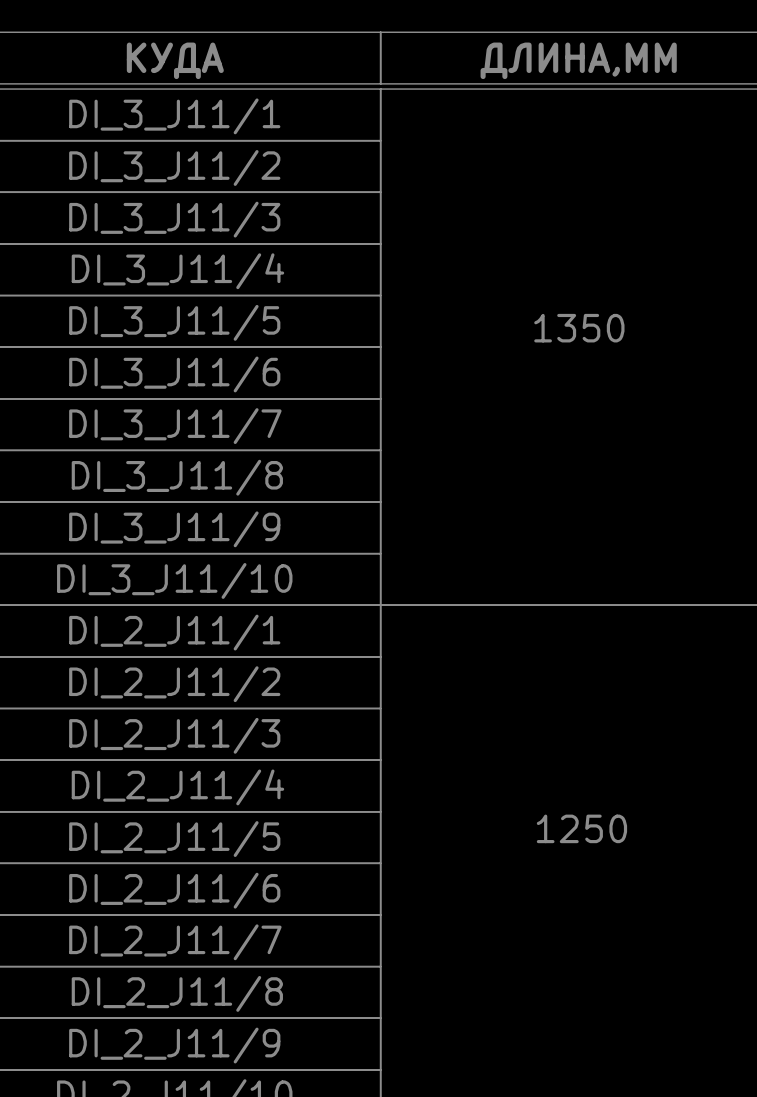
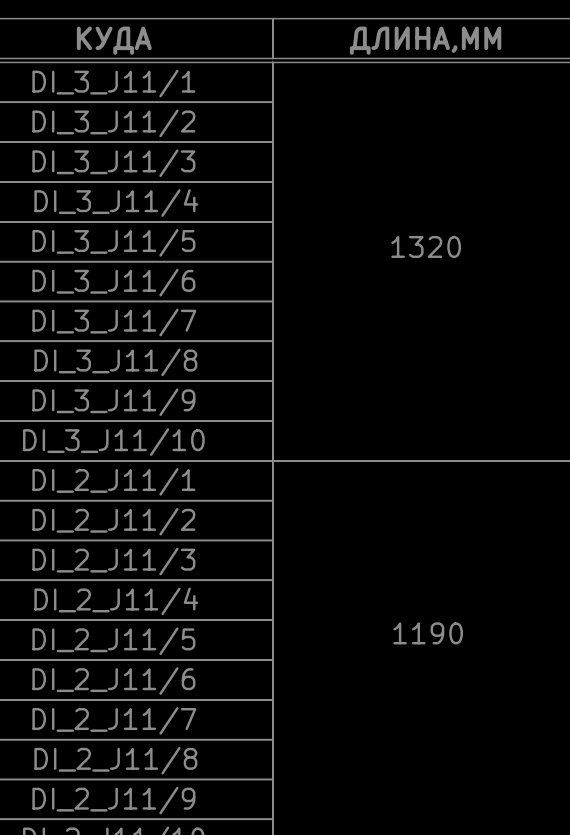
text: 1350 (579, 328) -> 1320 (426, 246)
text: 1250 (581, 828) -> 1190 (428, 633)

